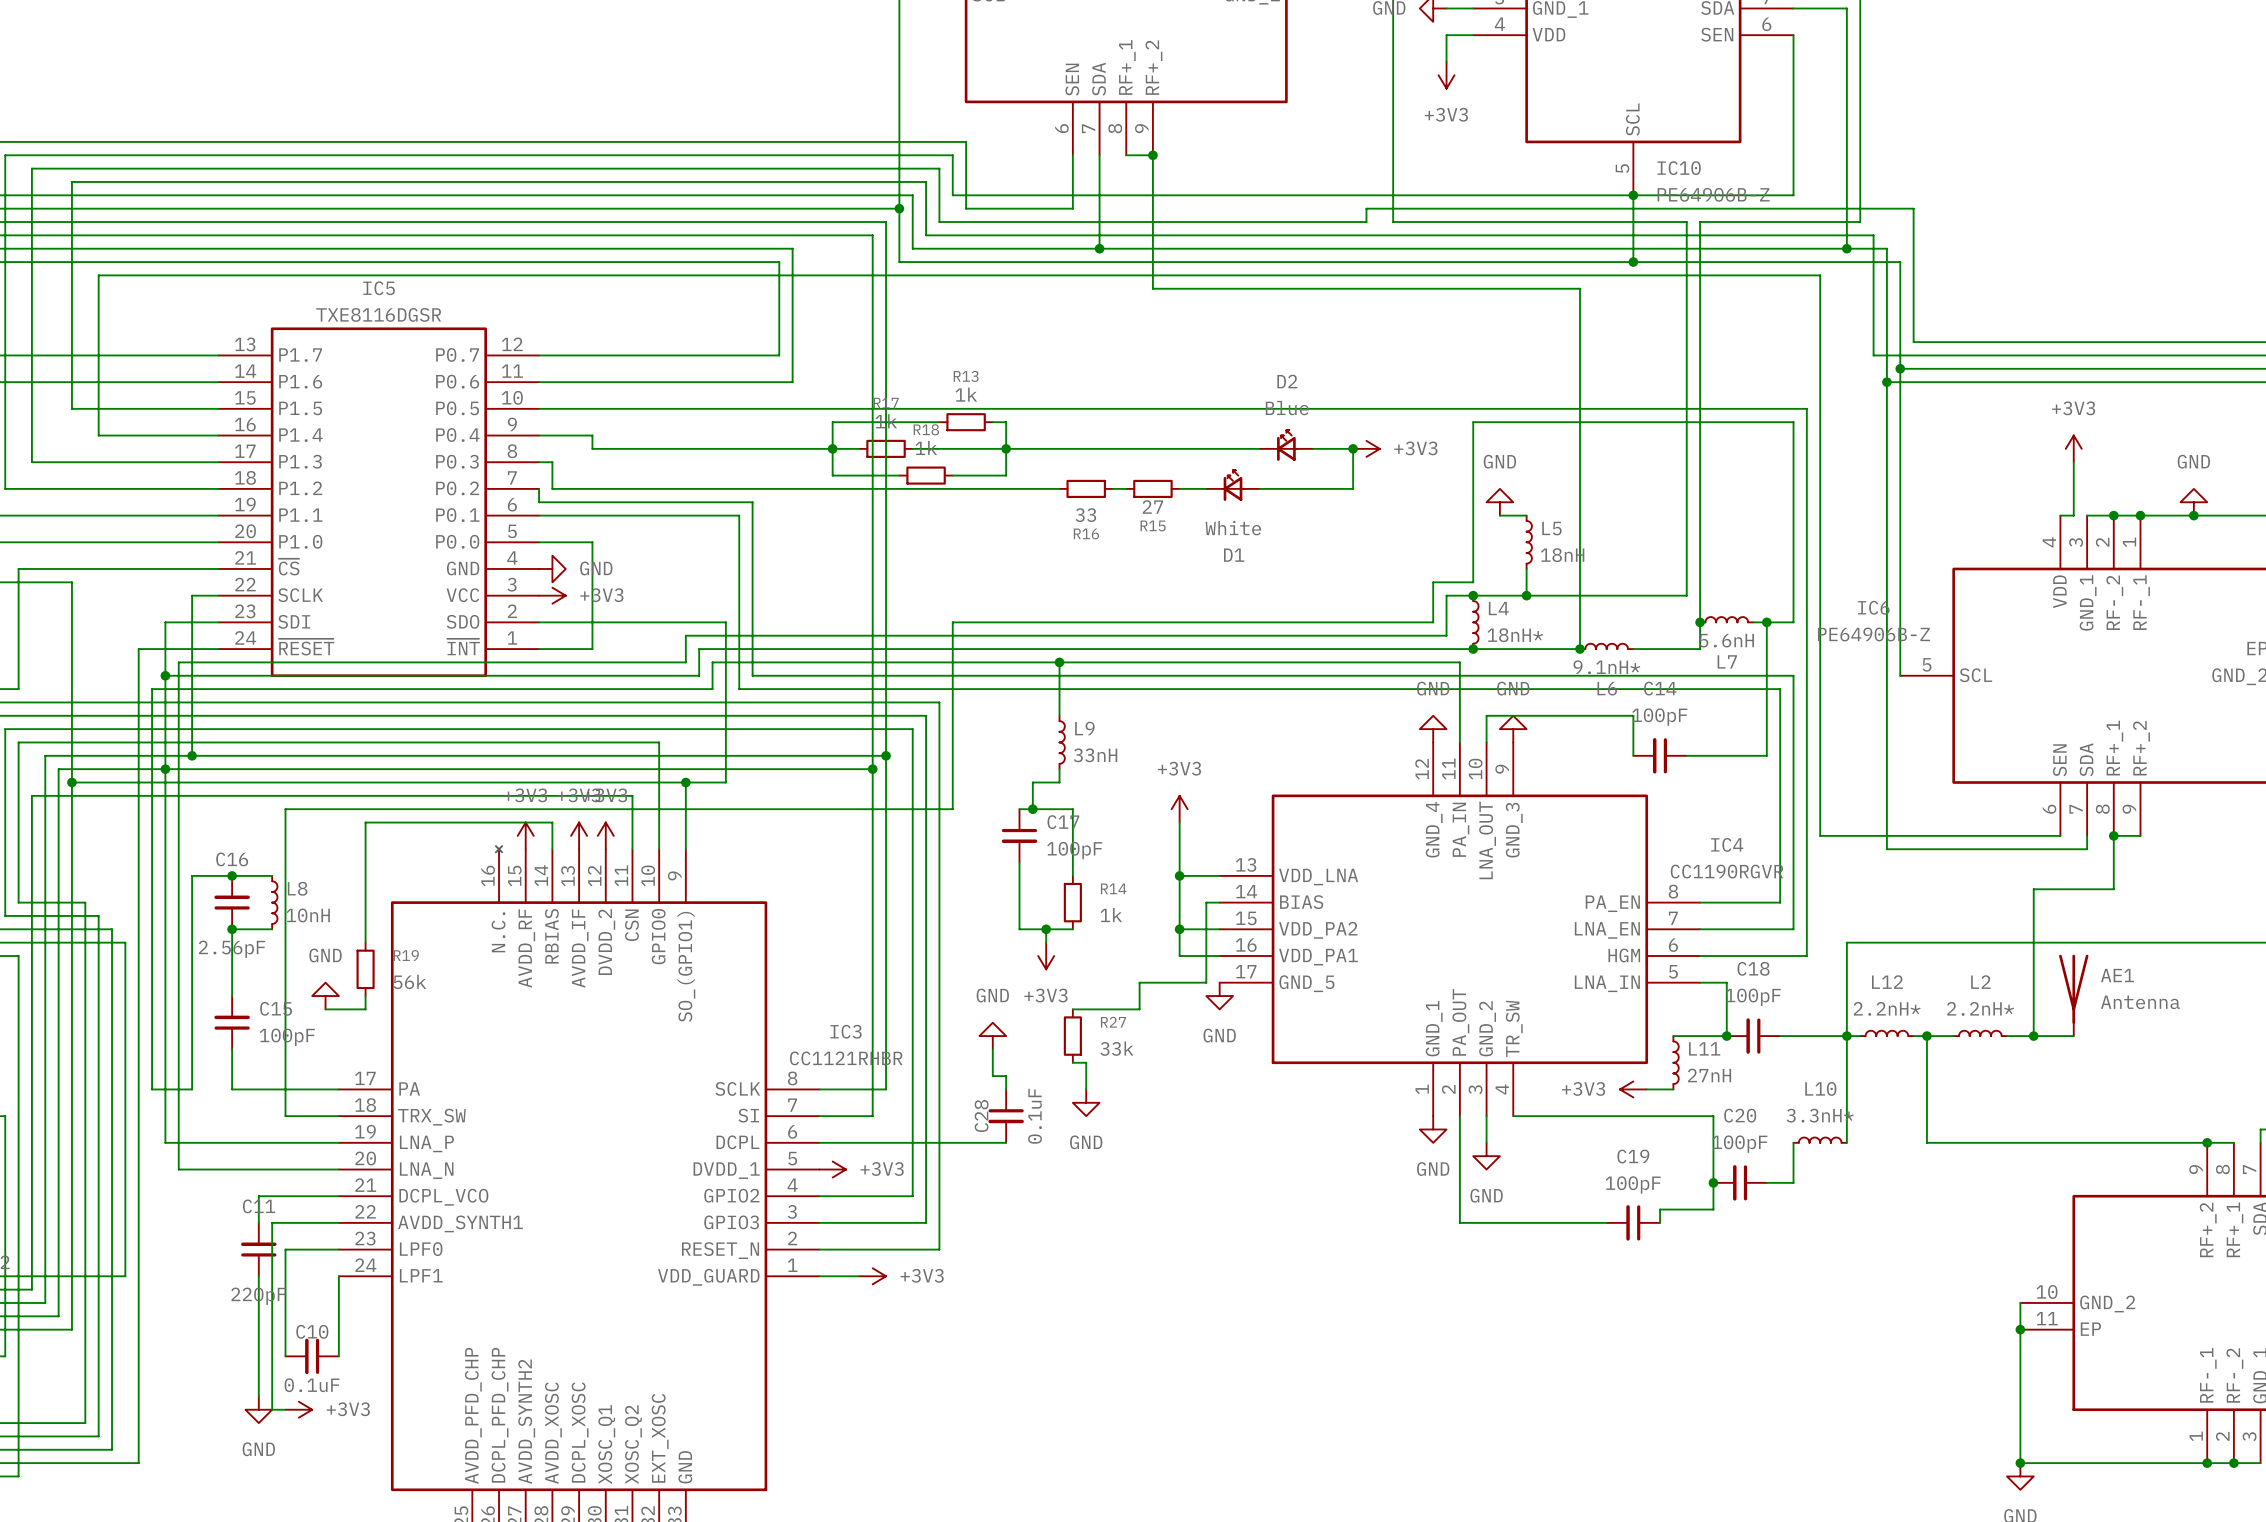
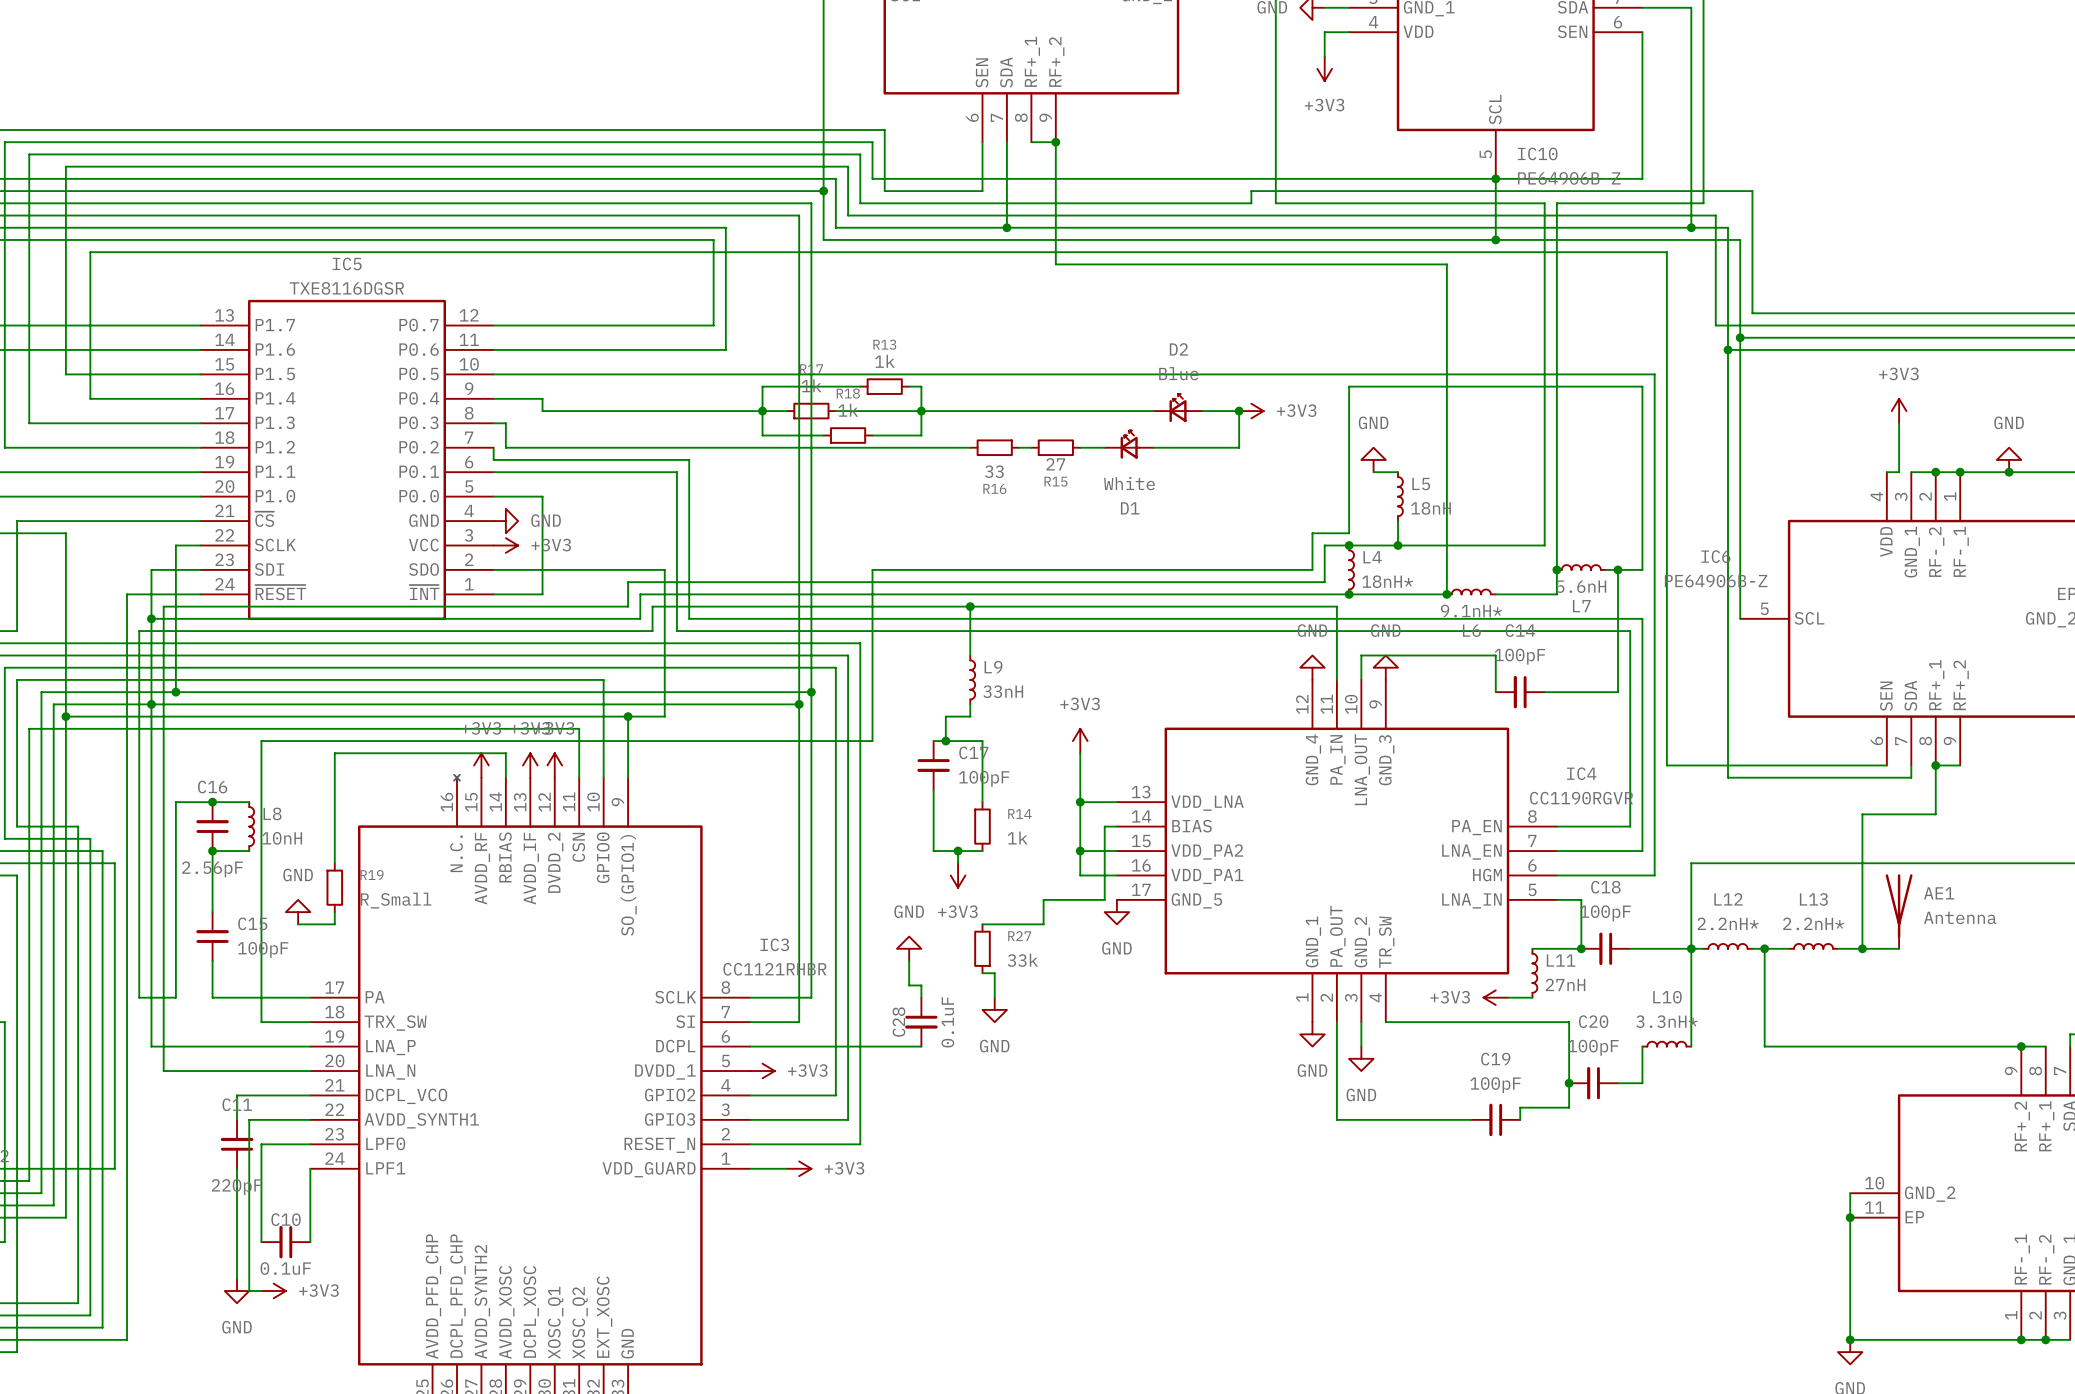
R19 value: 56k (409, 981) -> R_Small (396, 900)
L2 name: L2 (1980, 982) -> L13 (1813, 899)

